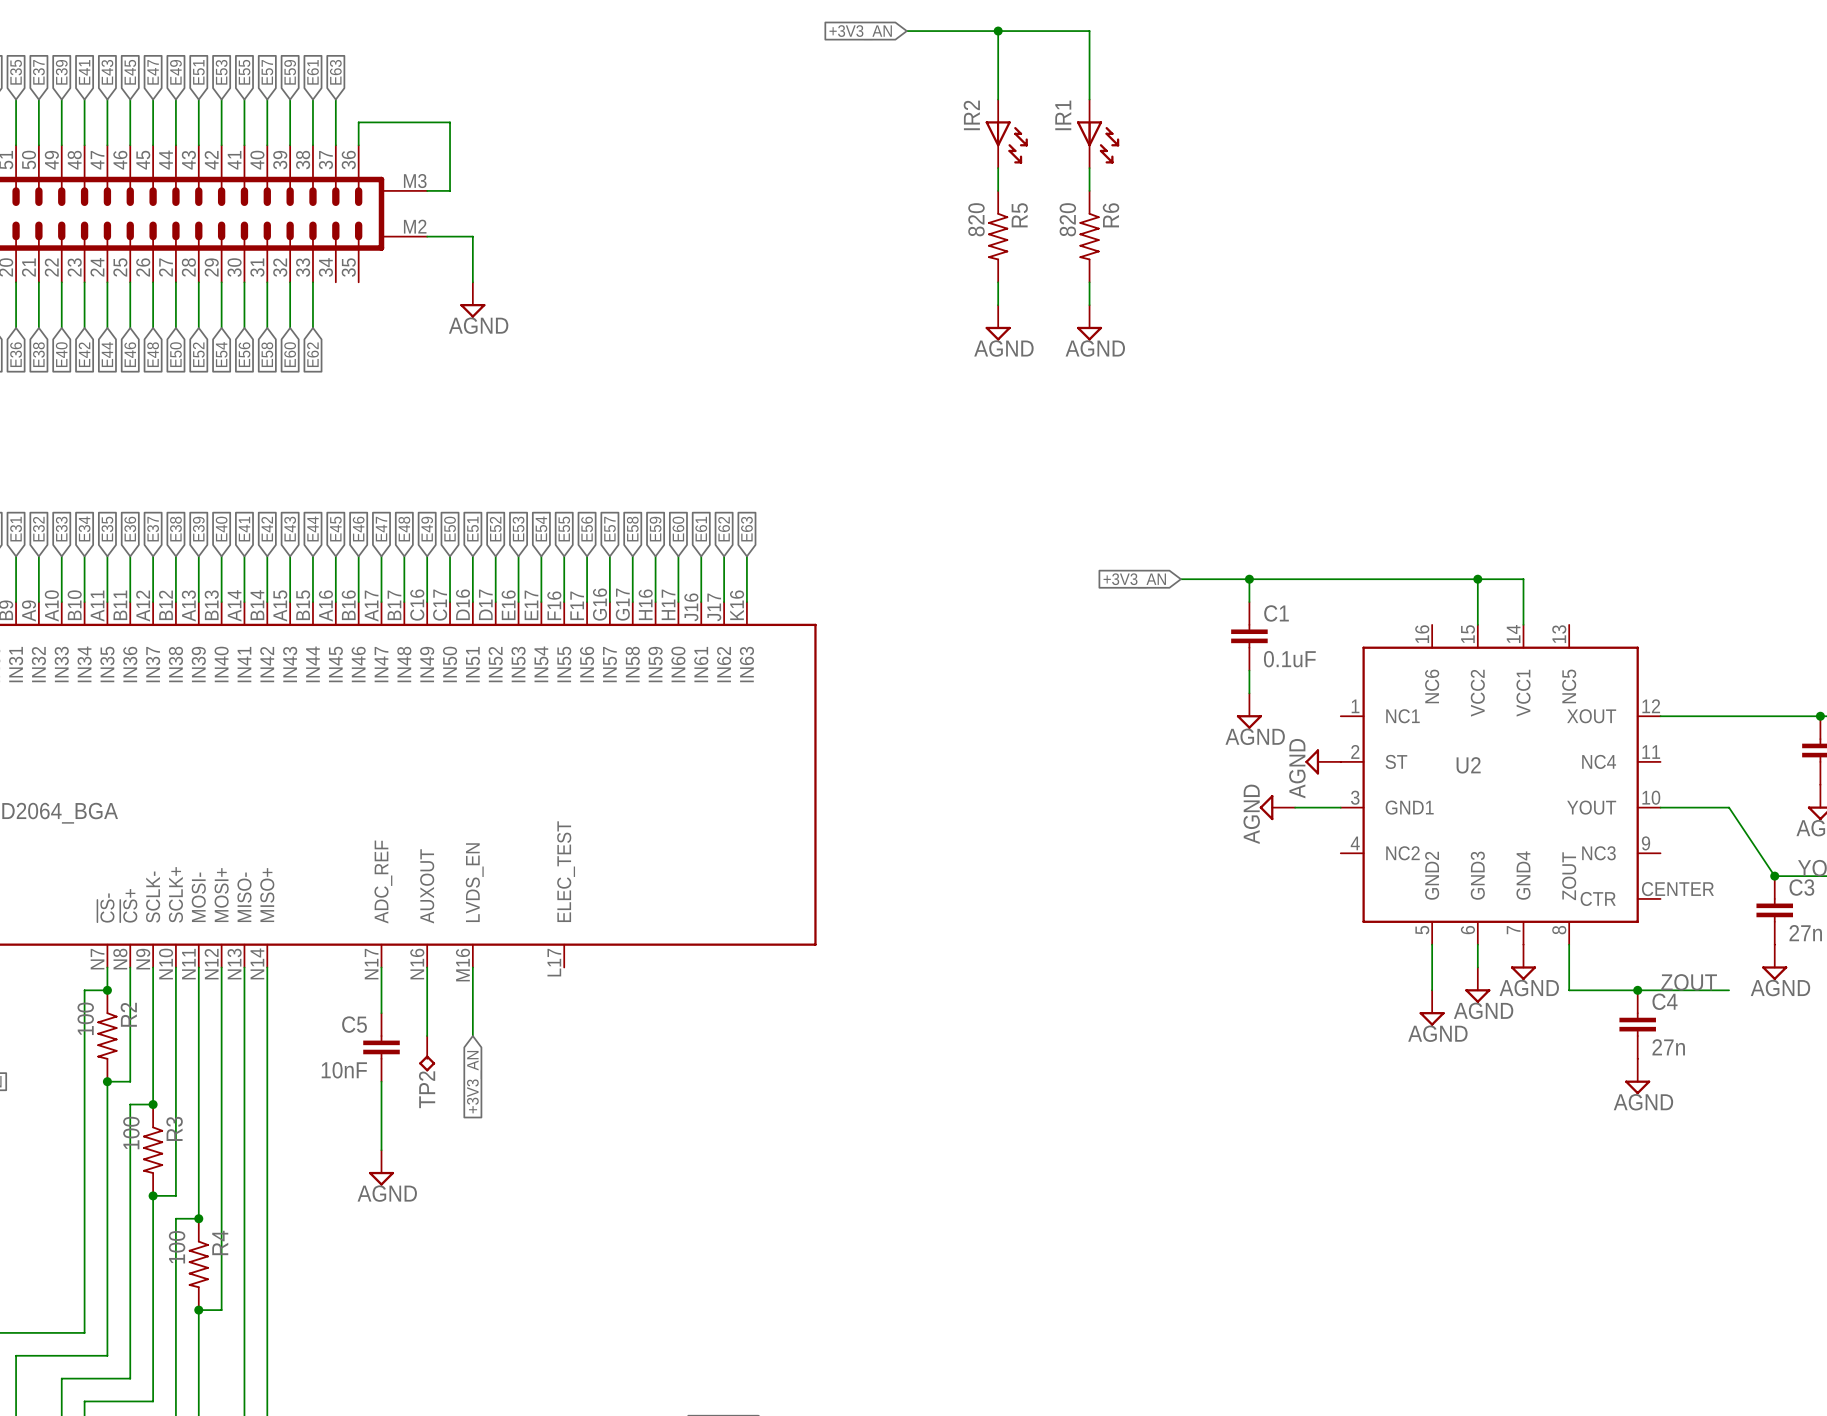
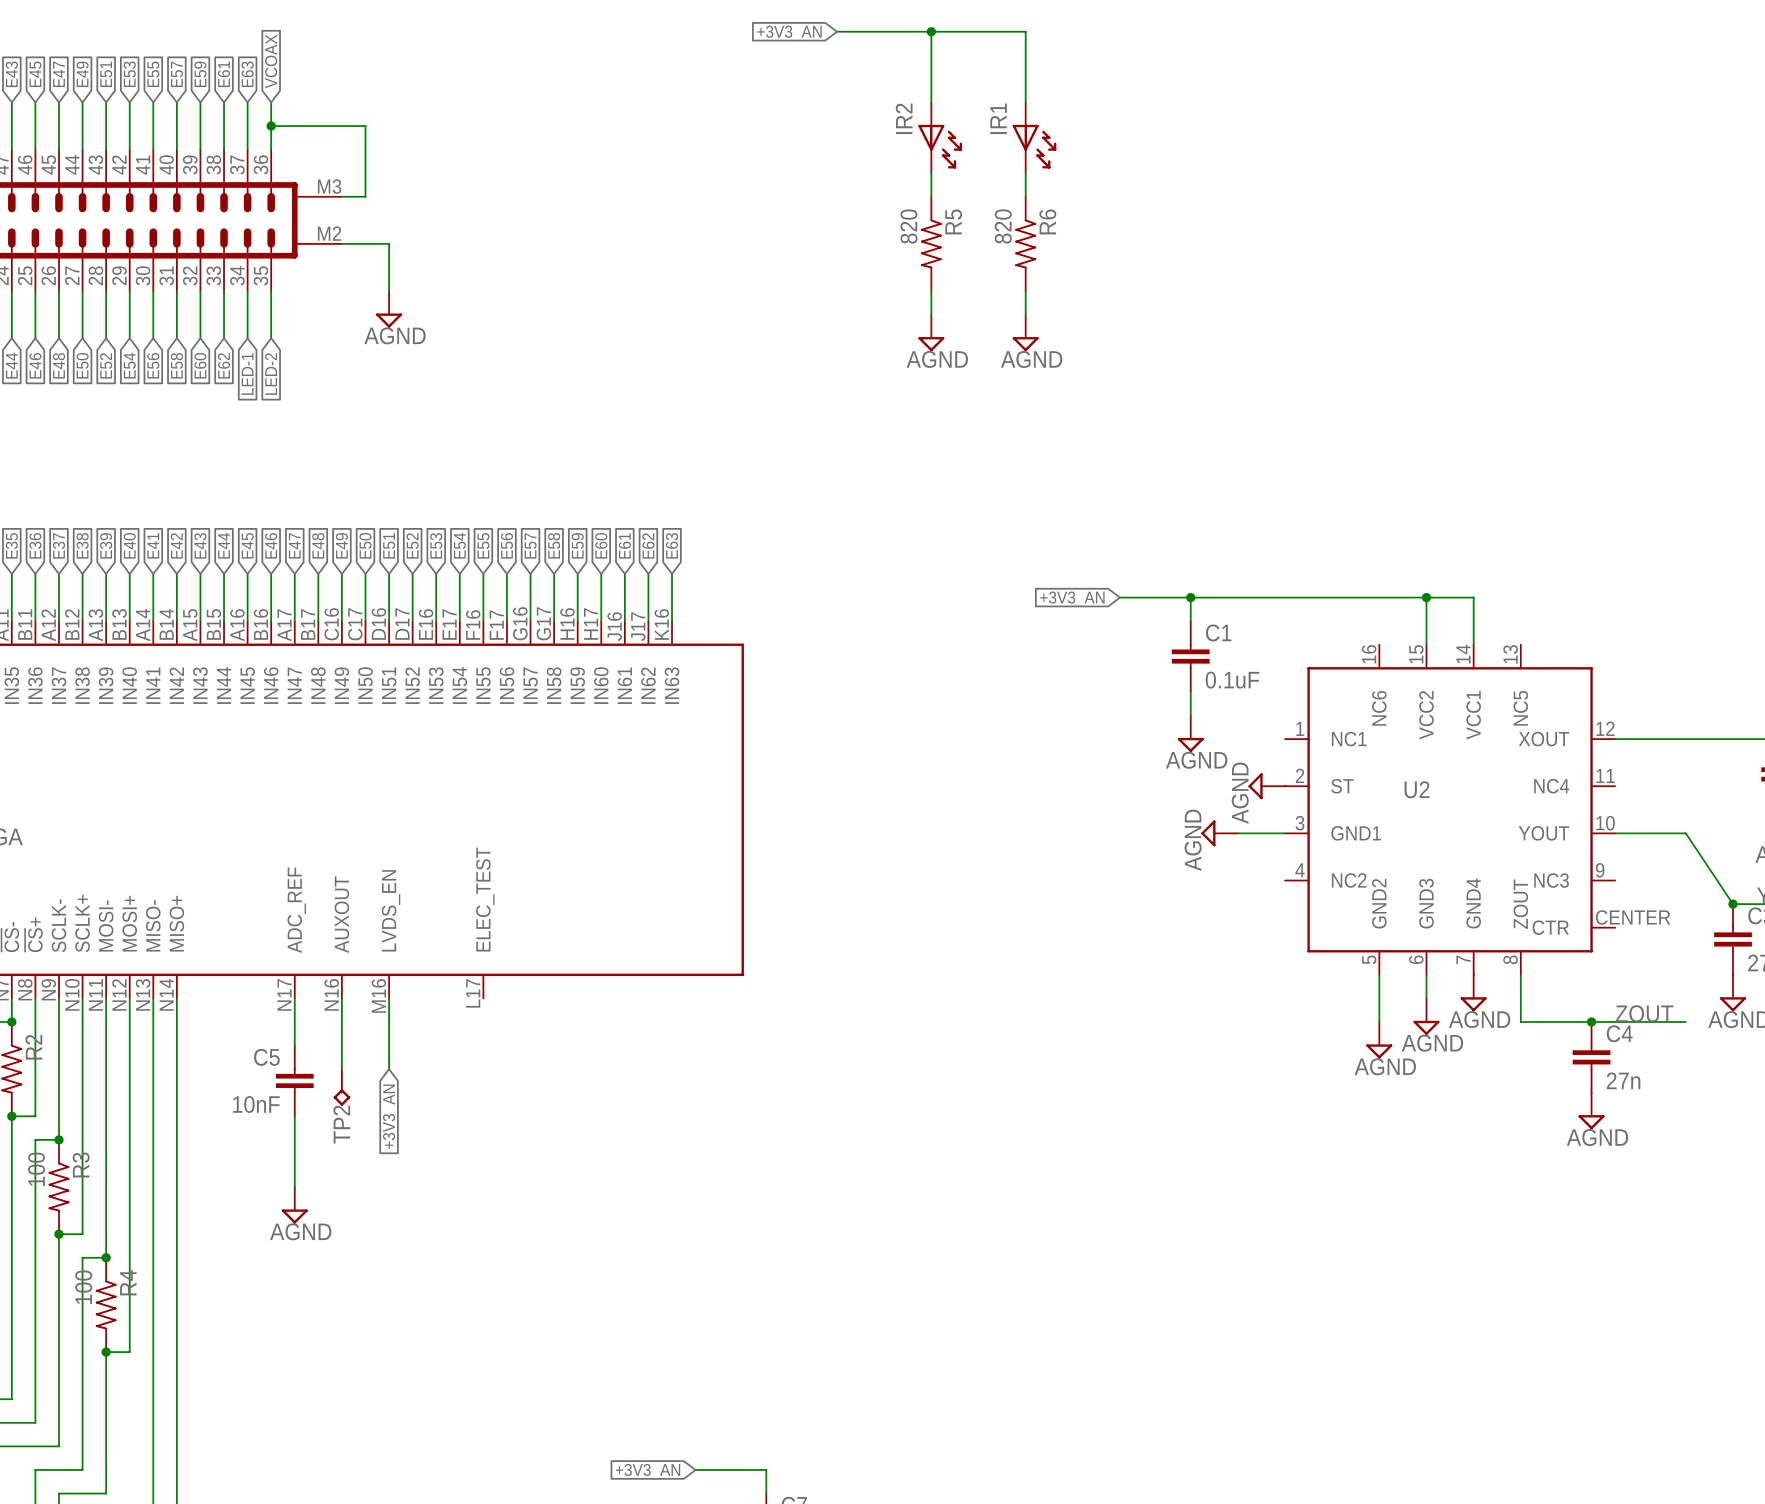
global label: none -> VCOAX (271, 61)
wire: none -> (271, 102) (271, 126)
junction: none -> (271, 126)
wire: none -> (247, 291) (247, 338)
wire: none -> (271, 291) (271, 338)
global label: none -> LED-1 (247, 373)
global label: none -> LED-2 (271, 373)

